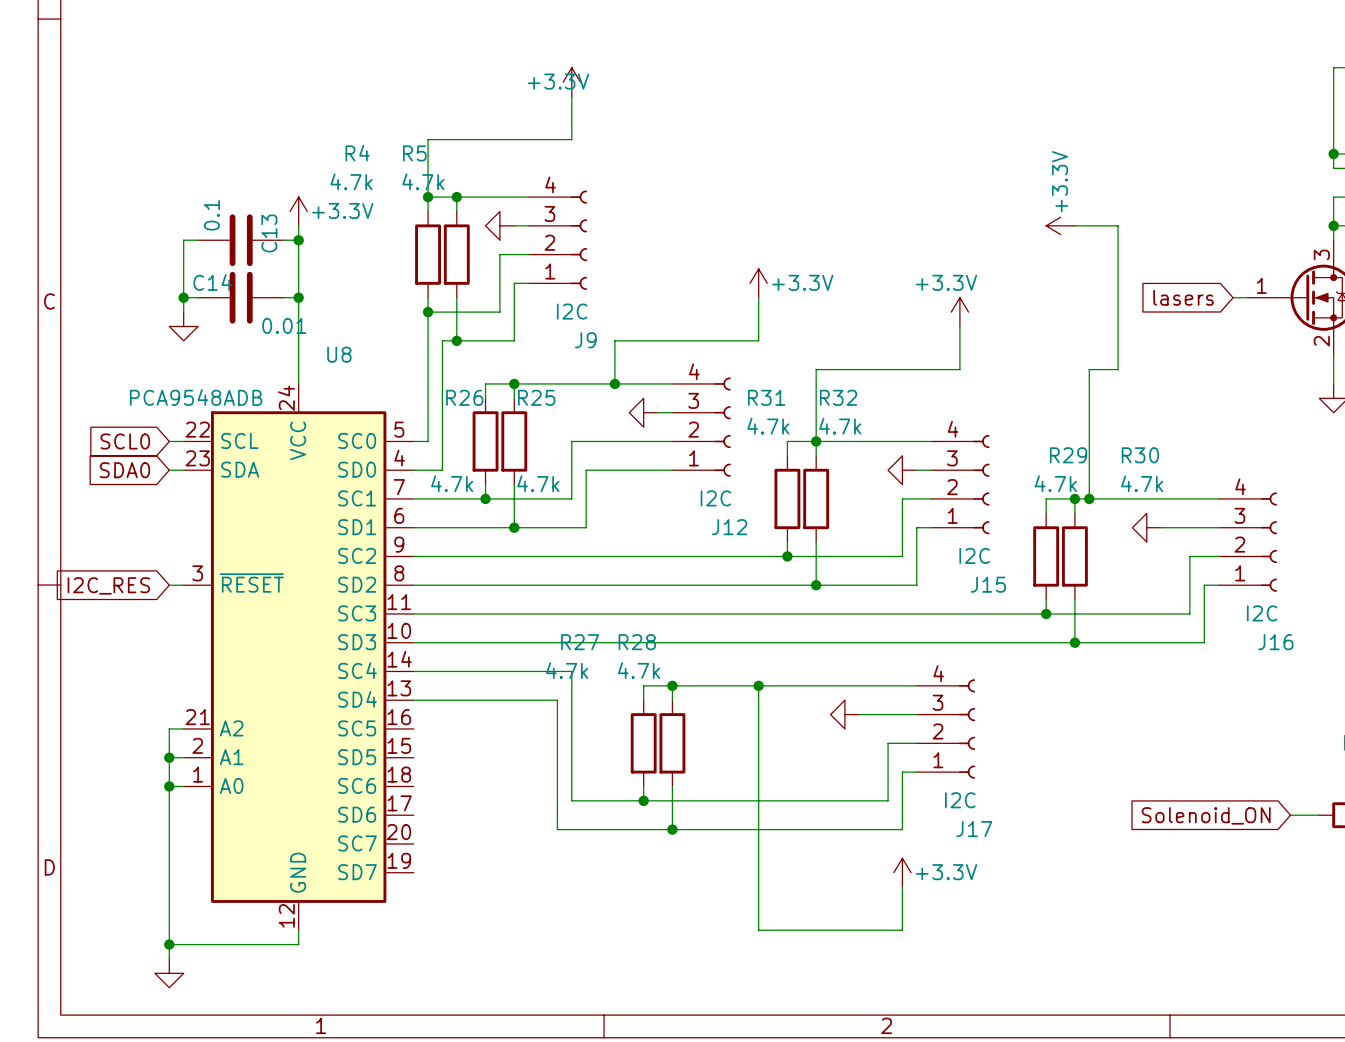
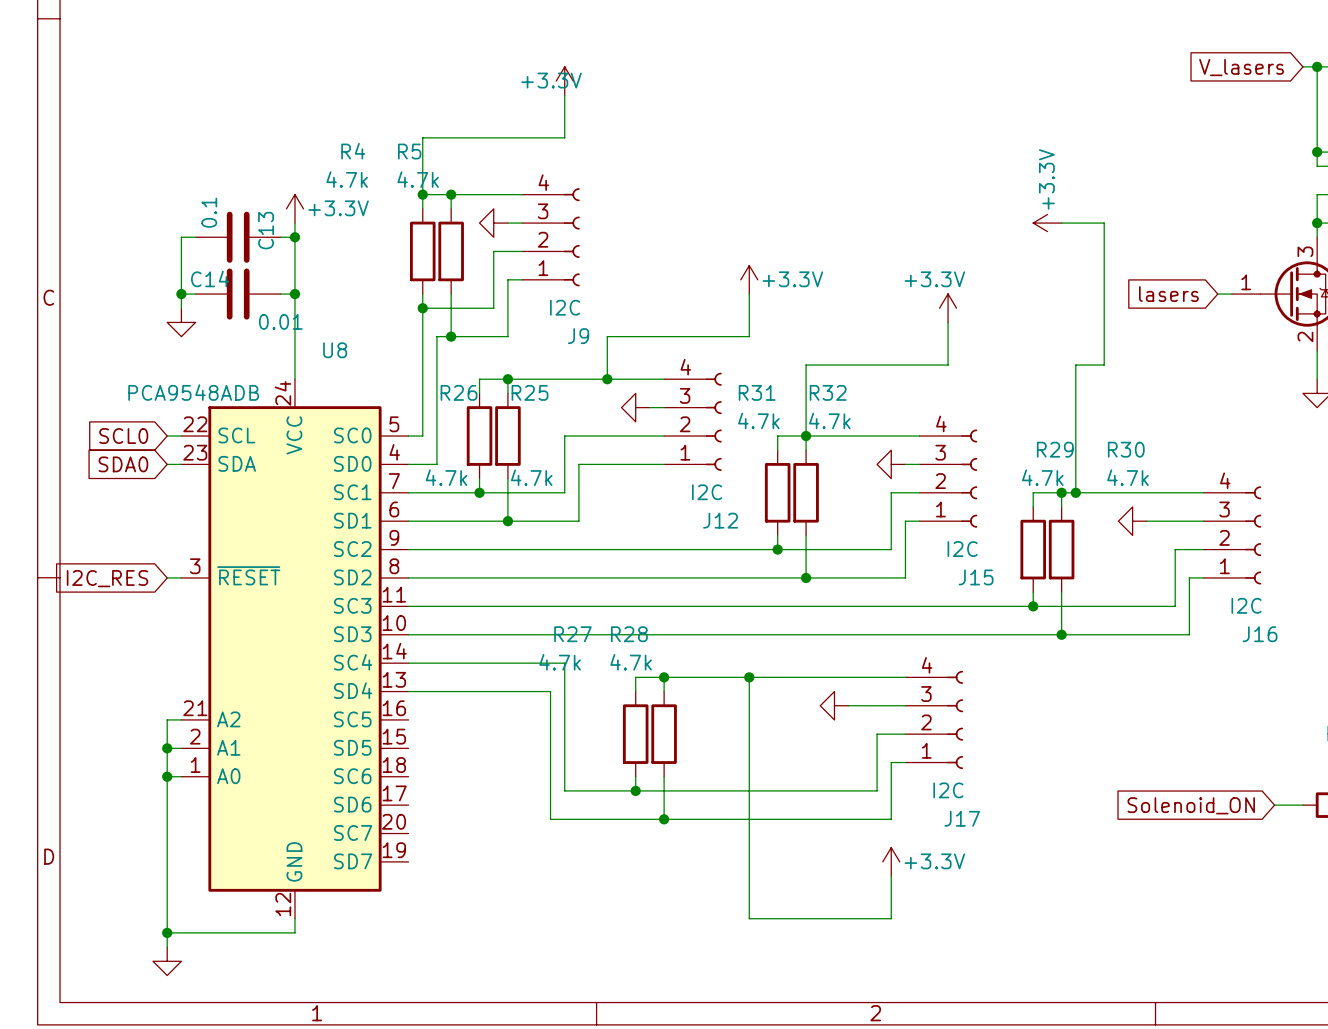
wire: none -> (1302, 66) (1317, 66)
junction: none -> (1317, 66)
global label: none -> V_lasers (1241, 67)

